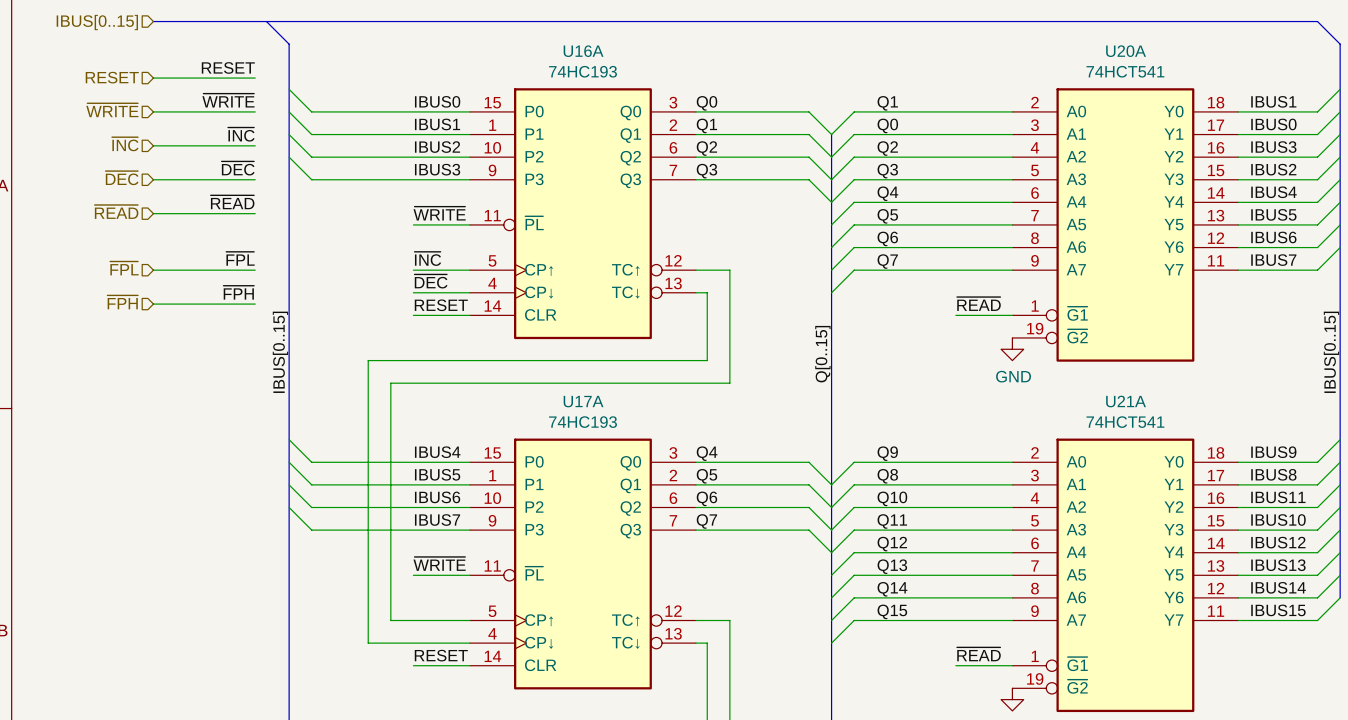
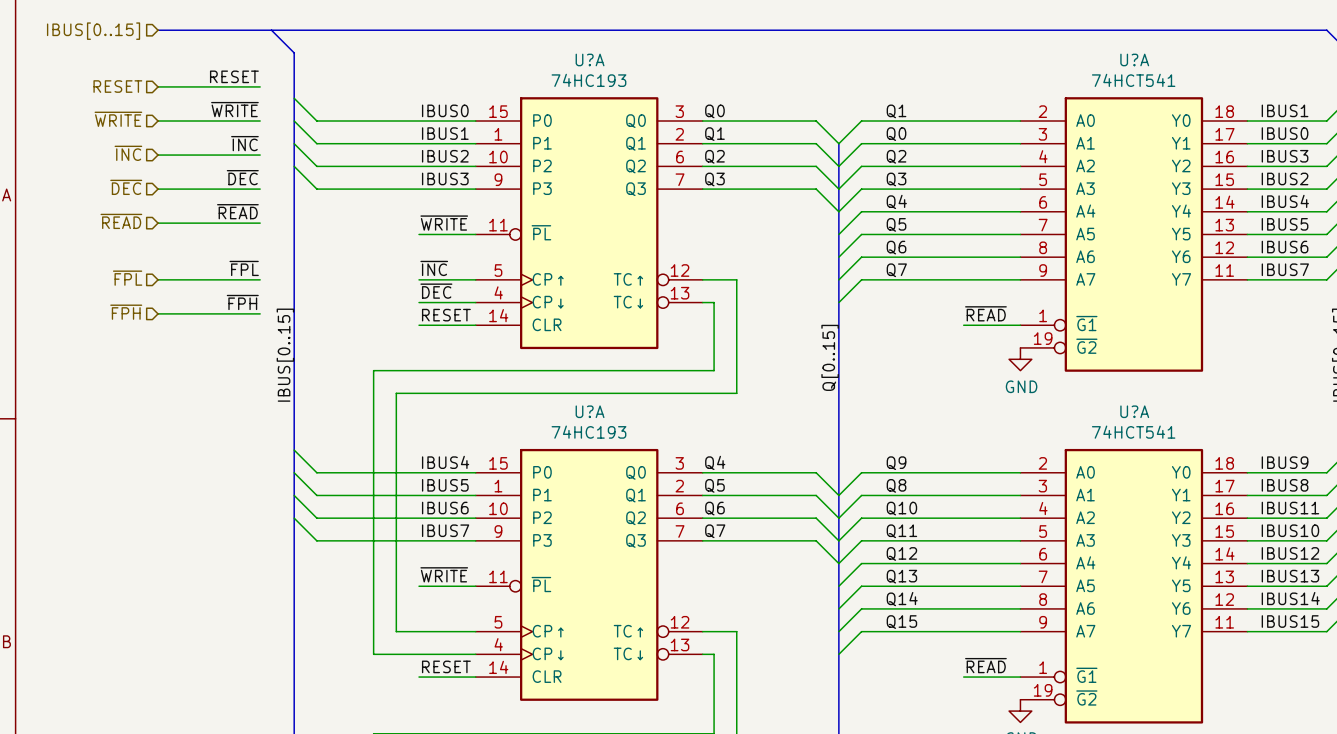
U16A name: U16A (583, 51) -> U?A (590, 59)
U20A name: U20A (1126, 51) -> U?A (1134, 59)
U17A name: U17A (583, 401) -> U?A (590, 411)
U21A name: U21A (1126, 401) -> U?A (1134, 411)

